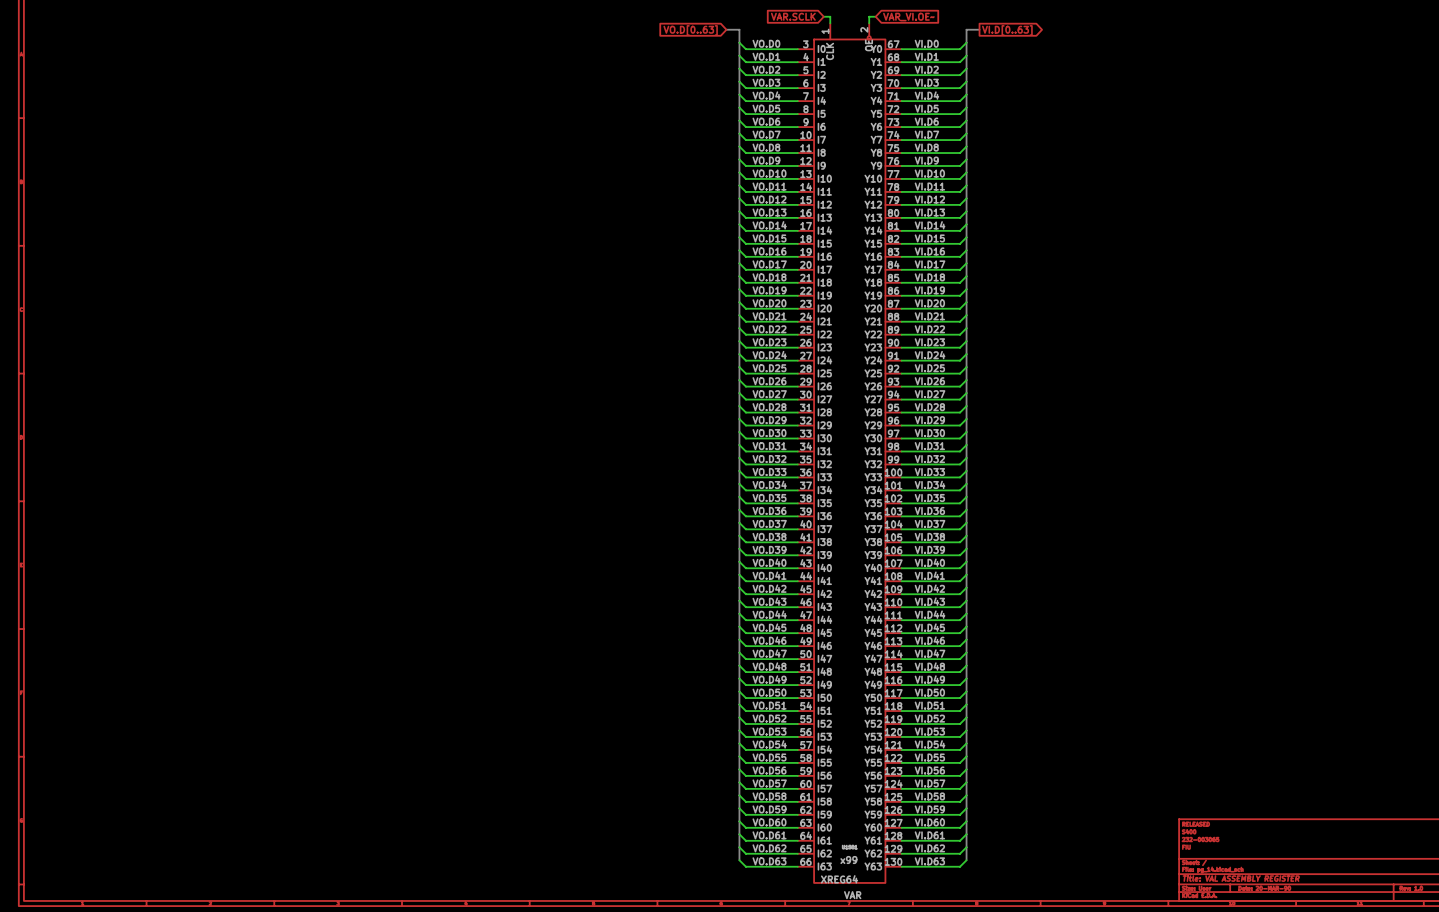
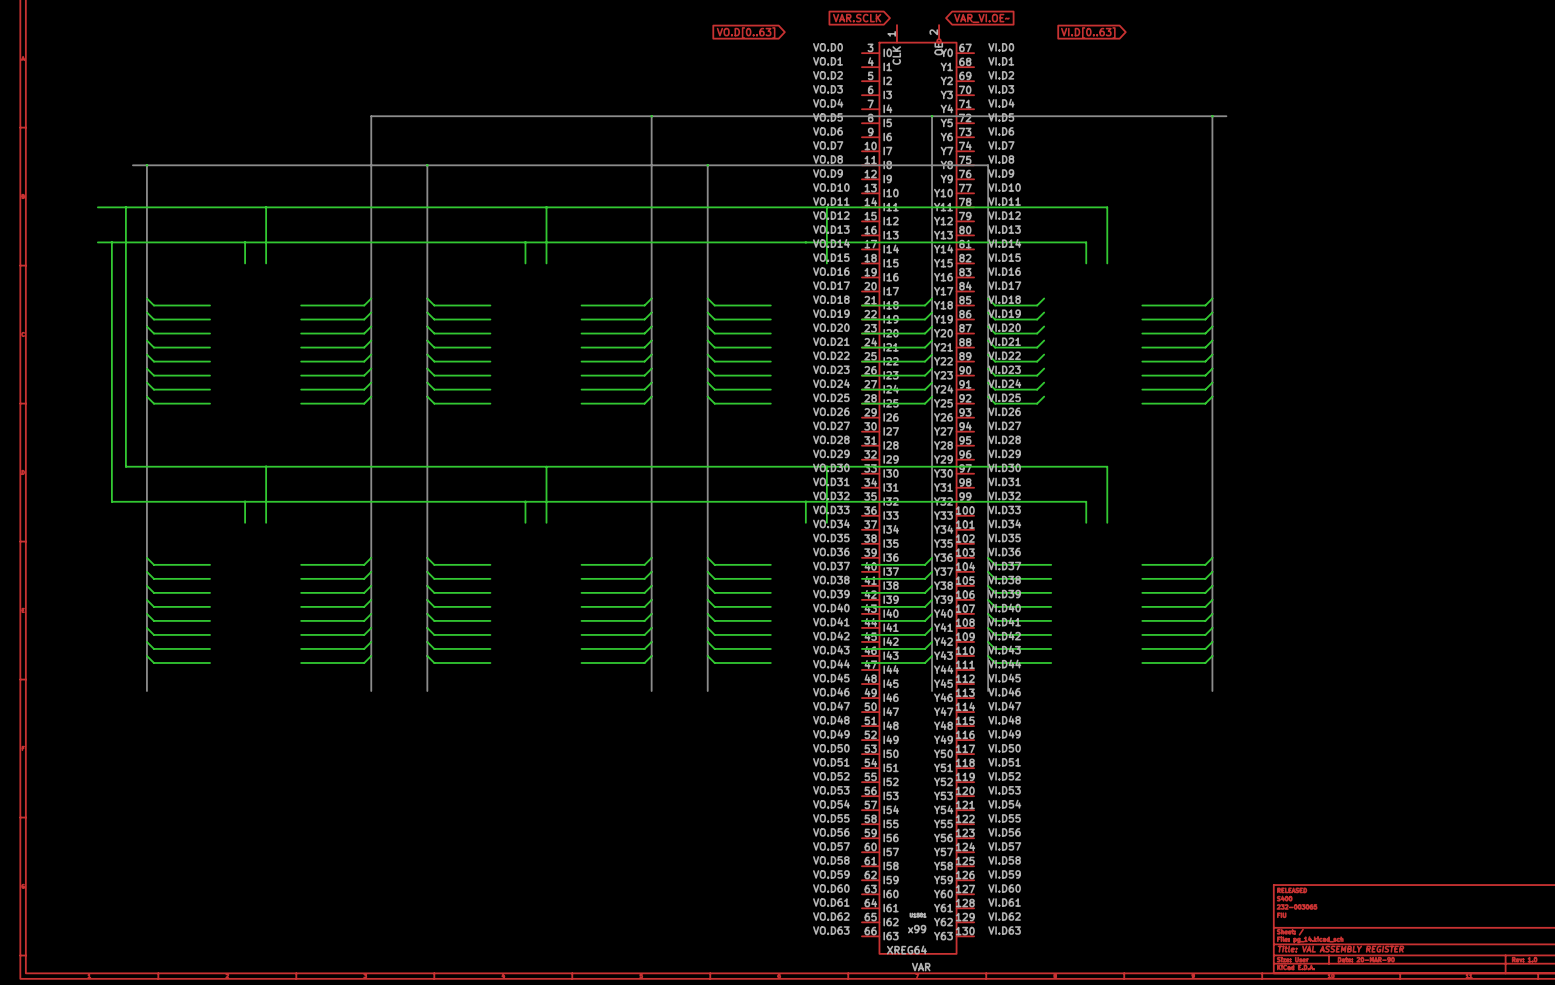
wire: (823, 16) (830, 16) (830, 23) -> none
wire: (875, 16) (869, 16) (869, 23) -> none
bus: (726, 29) (739, 29) (739, 860) -> none
bus: (979, 29) (966, 29) (966, 860) -> none
wire: (739, 42) (745, 49) (797, 49) -> none
wire: (966, 42) (960, 49) (901, 49) -> none
wire: (739, 55) (745, 62) (797, 62) -> none
wire: (966, 55) (960, 62) (901, 62) -> none
wire: (739, 68) (745, 75) (797, 75) -> none
wire: (966, 68) (960, 75) (901, 75) -> none
wire: (739, 81) (745, 88) (797, 88) -> none
wire: (966, 81) (960, 88) (901, 88) -> none
wire: (739, 94) (745, 101) (797, 101) -> none
wire: (966, 94) (960, 101) (901, 101) -> none
bus: none -> (651, 116) (651, 691)
junction: none -> (651, 116)
wire: (739, 107) (745, 114) (797, 114) -> none
bus: none -> (932, 116) (932, 691)
junction: none -> (932, 116)
wire: (966, 107) (960, 114) (901, 114) -> none
bus: none -> (1212, 116) (1212, 691)
junction: none -> (1212, 116)
bus: none -> (1226, 116) (371, 116) (371, 691)
wire: (739, 120) (745, 127) (797, 127) -> none
wire: (966, 120) (960, 127) (901, 127) -> none
wire: (739, 133) (745, 140) (797, 140) -> none
wire: (966, 133) (960, 140) (901, 140) -> none
wire: (966, 146) (960, 153) (901, 153) -> none
bus: none -> (132, 165) (988, 165) (988, 691)
bus: none -> (146, 165) (146, 691)
junction: none -> (146, 165)
bus: none -> (427, 165) (427, 691)
junction: none -> (427, 165)
bus: none -> (707, 165) (707, 691)
junction: none -> (707, 165)
wire: (739, 159) (745, 165) (797, 165) -> none
wire: (966, 159) (960, 165) (901, 165) -> none
wire: (739, 172) (745, 178) (797, 178) -> none
wire: (966, 172) (960, 178) (901, 178) -> none
wire: (739, 185) (745, 191) -> (97, 207) (805, 207)
wire: (966, 185) (960, 191) -> (1107, 263) (1107, 207) (1037, 207)
wire: none -> (125, 207) (125, 466) (1107, 466) (1107, 522)
wire: none -> (266, 207) (266, 263)
wire: none -> (546, 207) (546, 263)
wire: none -> (826, 207) (826, 263)
wire: none -> (861, 207) (974, 207)
wire: (739, 198) (745, 204) (797, 204) -> none
wire: (966, 198) (960, 204) (901, 204) -> none
wire: (739, 211) (745, 217) (797, 217) -> none
wire: (966, 211) (960, 217) (901, 217) -> none
wire: none -> (97, 242) (1086, 242) (1086, 263)
wire: none -> (111, 242) (111, 501) (805, 501) (805, 522)
wire: none -> (245, 242) (245, 263)
wire: none -> (525, 242) (525, 263)
wire: (739, 224) (745, 230) (797, 230) -> none
junction: none -> (805, 242)
wire: (966, 224) (960, 230) (901, 230) -> none
wire: (739, 237) (745, 243) (797, 243) -> none
wire: (966, 237) (960, 243) (901, 243) -> none
wire: (739, 250) (745, 256) (797, 256) -> none
wire: (966, 250) (960, 256) (901, 256) -> none
wire: (739, 263) (745, 269) (797, 269) -> none
wire: (966, 263) (960, 269) (901, 269) -> none
wire: none -> (146, 298) (153, 305) (210, 305)
wire: none -> (371, 298) (364, 305) (301, 305)
wire: none -> (427, 298) (434, 305) (490, 305)
wire: none -> (651, 298) (644, 305) (581, 305)
wire: none -> (707, 298) (714, 305) (770, 305)
wire: (739, 276) (745, 282) (797, 282) -> (932, 298) (925, 305) (861, 305)
wire: none -> (1212, 298) (1205, 305) (1142, 305)
wire: (901, 282) (921, 282) -> (988, 298) (995, 305)
wire: none -> (146, 312) (153, 319) (210, 319)
wire: none -> (371, 312) (364, 319) (301, 319)
wire: none -> (427, 312) (434, 319) (490, 319)
wire: none -> (651, 312) (644, 319) (581, 319)
wire: none -> (707, 312) (714, 319) (770, 319)
wire: (739, 289) (745, 295) (797, 295) -> (932, 312) (925, 319) (861, 319)
wire: none -> (1212, 312) (1205, 319) (1142, 319)
wire: (901, 295) (921, 295) -> (988, 312) (995, 319)
wire: none -> (146, 326) (153, 333) (210, 333)
wire: none -> (371, 326) (364, 333) (301, 333)
wire: none -> (427, 326) (434, 333) (490, 333)
wire: none -> (651, 326) (644, 333) (581, 333)
wire: none -> (707, 326) (714, 333) (770, 333)
wire: (739, 302) (745, 308) (797, 308) -> (932, 326) (925, 333) (861, 333)
wire: none -> (1212, 326) (1205, 333) (1142, 333)
wire: (901, 308) (921, 308) -> (988, 326) (995, 333)
wire: none -> (146, 340) (153, 347) (210, 347)
wire: none -> (371, 340) (364, 347) (301, 347)
wire: none -> (427, 340) (434, 347) (490, 347)
wire: none -> (651, 340) (644, 347) (581, 347)
wire: none -> (707, 340) (714, 347) (770, 347)
wire: (739, 315) (745, 321) (797, 321) -> (932, 340) (925, 347) (861, 347)
wire: none -> (1212, 340) (1205, 347) (1142, 347)
wire: (901, 321) (921, 321) -> (988, 340) (995, 347)
wire: none -> (146, 354) (153, 361) (210, 361)
wire: none -> (371, 354) (364, 361) (301, 361)
wire: none -> (427, 354) (434, 361) (490, 361)
wire: none -> (651, 354) (644, 361) (581, 361)
wire: none -> (707, 354) (714, 361) (770, 361)
wire: (739, 328) (745, 334) (797, 334) -> (932, 354) (925, 361) (861, 361)
wire: none -> (1212, 354) (1205, 361) (1142, 361)
wire: (901, 334) (921, 334) -> (988, 354) (995, 361)
wire: none -> (146, 368) (153, 375) (210, 375)
wire: none -> (371, 368) (364, 375) (301, 375)
wire: none -> (427, 368) (434, 375) (490, 375)
wire: none -> (651, 368) (644, 375) (581, 375)
wire: none -> (707, 368) (714, 375) (770, 375)
wire: (739, 341) (745, 347) (797, 347) -> (932, 368) (925, 375) (861, 375)
wire: none -> (1212, 368) (1205, 375) (1142, 375)
wire: (901, 347) (921, 347) -> (988, 368) (995, 375)
wire: none -> (146, 382) (153, 389) (210, 389)
wire: none -> (371, 382) (364, 389) (301, 389)
wire: none -> (427, 382) (434, 389) (490, 389)
wire: none -> (651, 382) (644, 389) (581, 389)
wire: none -> (707, 382) (714, 389) (770, 389)
wire: (739, 354) (745, 360) (797, 360) -> (932, 382) (925, 389) (861, 389)
wire: none -> (1212, 382) (1205, 389) (1142, 389)
wire: (901, 360) (921, 360) -> (988, 382) (995, 389)
wire: none -> (146, 396) (153, 403) (210, 403)
wire: none -> (371, 396) (364, 403) (301, 403)
wire: none -> (427, 396) (434, 403) (490, 403)
wire: none -> (651, 396) (644, 403) (581, 403)
wire: none -> (707, 396) (714, 403) (770, 403)
wire: (739, 367) (745, 373) (797, 373) -> (932, 396) (925, 403) (861, 403)
wire: none -> (1212, 396) (1205, 403) (1142, 403)
wire: (901, 373) (921, 373) -> (988, 396) (995, 403)
wire: (739, 380) (745, 386) (797, 386) -> none
wire: (966, 380) (960, 386) (901, 386) -> none
wire: (739, 393) (745, 399) (797, 399) -> none
wire: (966, 393) (960, 399) (901, 399) -> none
wire: (739, 406) (745, 412) (797, 412) -> none
wire: (966, 406) (960, 412) (901, 412) -> none
wire: (739, 419) (745, 425) (797, 425) -> none
wire: (966, 419) (960, 425) (901, 425) -> none
wire: none -> (266, 466) (266, 522)
wire: none -> (546, 466) (546, 522)
wire: (739, 432) (745, 438) (797, 438) -> none
wire: none -> (826, 466) (826, 522)
wire: (966, 432) (960, 438) (901, 438) -> none
wire: (739, 444) (745, 451) (797, 451) -> none
wire: (966, 444) (960, 451) (901, 451) -> none
wire: (739, 457) (745, 464) -> none
wire: (966, 457) (960, 464) -> (1086, 522) (1086, 501) (1037, 501)
wire: none -> (245, 501) (245, 522)
wire: none -> (525, 501) (525, 522)
wire: none -> (861, 501) (974, 501)
wire: (739, 470) (745, 477) (797, 477) -> none
wire: (966, 470) (960, 477) (901, 477) -> none
wire: (739, 483) (745, 490) (797, 490) -> none
wire: (966, 483) (960, 490) (901, 490) -> none
wire: (739, 496) (745, 503) (797, 503) -> none
wire: (966, 496) (960, 503) (901, 503) -> none
wire: (739, 509) (745, 516) (797, 516) -> none
wire: (966, 509) (960, 516) (901, 516) -> none
wire: none -> (146, 557) (153, 564) (210, 564)
wire: none -> (371, 557) (364, 564) (301, 564)
wire: none -> (427, 557) (434, 564) (490, 564)
wire: none -> (651, 557) (644, 564) (581, 564)
wire: none -> (707, 557) (714, 564) (770, 564)
wire: none -> (932, 557) (925, 564) (861, 564)
wire: none -> (988, 557) (995, 564) (1051, 564)
wire: none -> (1212, 557) (1205, 564) (1142, 564)
wire: (739, 522) (745, 529) (797, 529) -> none
wire: (966, 522) (960, 529) (901, 529) -> none
wire: none -> (146, 571) (153, 578) (210, 578)
wire: none -> (371, 571) (364, 578) (301, 578)
wire: none -> (427, 571) (434, 578) (490, 578)
wire: none -> (651, 571) (644, 578) (581, 578)
wire: none -> (707, 571) (714, 578) (770, 578)
wire: none -> (932, 571) (925, 578) (861, 578)
wire: none -> (988, 571) (995, 578) (1051, 578)
wire: none -> (1212, 571) (1205, 578) (1142, 578)
wire: (739, 535) (745, 542) (797, 542) -> none
wire: (966, 535) (960, 542) (901, 542) -> none
wire: none -> (146, 585) (153, 592) (210, 592)
wire: none -> (371, 585) (364, 592) (301, 592)
wire: none -> (427, 585) (434, 592) (490, 592)
wire: none -> (651, 585) (644, 592) (581, 592)
wire: none -> (707, 585) (714, 592) (770, 592)
wire: none -> (932, 585) (925, 592) (861, 592)
wire: none -> (988, 585) (995, 592) (1051, 592)
wire: none -> (1212, 585) (1205, 592) (1142, 592)
wire: (739, 548) (745, 555) (797, 555) -> none
wire: (966, 548) (960, 555) (901, 555) -> none
wire: none -> (146, 599) (153, 606) (210, 606)
wire: none -> (371, 599) (364, 606) (301, 606)
wire: none -> (427, 599) (434, 606) (490, 606)
wire: none -> (651, 599) (644, 606) (581, 606)
wire: none -> (707, 599) (714, 606) (770, 606)
wire: none -> (932, 599) (925, 606) (861, 606)
wire: none -> (988, 599) (995, 606) (1051, 606)
wire: none -> (1212, 599) (1205, 606) (1142, 606)
wire: (739, 561) (745, 568) (797, 568) -> none
wire: (966, 561) (960, 568) (901, 568) -> none
wire: none -> (146, 613) (153, 620) (210, 620)
wire: none -> (371, 613) (364, 620) (301, 620)
wire: none -> (427, 613) (434, 620) (490, 620)
wire: none -> (651, 613) (644, 620) (581, 620)
wire: none -> (707, 613) (714, 620) (770, 620)
wire: none -> (932, 613) (925, 620) (861, 620)
wire: none -> (988, 613) (995, 620) (1051, 620)
wire: none -> (1212, 613) (1205, 620) (1142, 620)
wire: (739, 574) (745, 581) (797, 581) -> none
wire: (966, 574) (960, 581) (901, 581) -> none
wire: none -> (146, 627) (153, 634) (210, 634)
wire: none -> (371, 627) (364, 634) (301, 634)
wire: none -> (427, 627) (434, 634) (490, 634)
wire: none -> (651, 627) (644, 634) (581, 634)
wire: none -> (707, 627) (714, 634) (770, 634)
wire: none -> (932, 627) (925, 634) (861, 634)
wire: none -> (988, 627) (995, 634) (1051, 634)
wire: none -> (1212, 627) (1205, 634) (1142, 634)
wire: (739, 587) (745, 594) (797, 594) -> none
wire: (966, 587) (960, 594) (901, 594) -> none
wire: none -> (146, 641) (153, 648) (210, 648)
wire: none -> (371, 641) (364, 648) (301, 648)
wire: none -> (427, 641) (434, 648) (490, 648)
wire: none -> (651, 641) (644, 648) (581, 648)
wire: none -> (707, 641) (714, 648) (770, 648)
wire: none -> (932, 641) (925, 648) (861, 648)
wire: none -> (988, 641) (995, 648) (1051, 648)
wire: none -> (1212, 641) (1205, 648) (1142, 648)
wire: (739, 600) (745, 607) (797, 607) -> none
wire: (966, 600) (960, 607) (901, 607) -> none
wire: none -> (146, 655) (153, 662) (210, 662)
wire: none -> (371, 655) (364, 662) (301, 662)
wire: none -> (427, 655) (434, 662) (490, 662)
wire: none -> (651, 655) (644, 662) (581, 662)
wire: none -> (707, 655) (714, 662) (770, 662)
wire: none -> (932, 655) (925, 662) (861, 662)
wire: none -> (988, 655) (995, 662) (1051, 662)
wire: none -> (1212, 655) (1205, 662) (1142, 662)
wire: (739, 613) (745, 620) (797, 620) -> none
wire: (966, 613) (960, 620) (901, 620) -> none
wire: (739, 626) (745, 633) (797, 633) -> none
wire: (966, 626) (960, 633) (901, 633) -> none
wire: (739, 639) (745, 646) (797, 646) -> none
wire: (966, 639) (960, 646) (901, 646) -> none
wire: (739, 652) (745, 659) (797, 659) -> none
wire: (966, 652) (960, 659) (901, 659) -> none
wire: (739, 665) (745, 672) (797, 672) -> none
wire: (966, 665) (960, 672) (901, 672) -> none
wire: (739, 678) (745, 685) (797, 685) -> none
wire: (966, 678) (960, 685) (901, 685) -> none
wire: (739, 691) (745, 698) (797, 698) -> none
wire: (966, 691) (960, 698) (901, 698) -> none
wire: (739, 704) (745, 711) (797, 711) -> none
wire: (966, 704) (960, 711) (901, 711) -> none
wire: (739, 717) (745, 724) (797, 724) -> none
wire: (966, 717) (960, 724) (901, 724) -> none
wire: (739, 730) (745, 736) (797, 736) -> none
wire: (966, 730) (960, 736) (901, 736) -> none
wire: (739, 743) (745, 749) (797, 749) -> none
wire: (966, 743) (960, 749) (901, 749) -> none
wire: (739, 756) (745, 762) (797, 762) -> none
wire: (966, 756) (960, 762) (901, 762) -> none
wire: (739, 769) (745, 775) (797, 775) -> none
wire: (966, 769) (960, 775) (901, 775) -> none
wire: (739, 782) (745, 788) (797, 788) -> none
wire: (966, 782) (960, 788) (901, 788) -> none
wire: (739, 795) (745, 801) (797, 801) -> none
wire: (966, 795) (960, 801) (901, 801) -> none
wire: (739, 808) (745, 814) (797, 814) -> none
wire: (966, 808) (960, 814) (901, 814) -> none
wire: (739, 821) (745, 827) (797, 827) -> none
wire: (966, 821) (960, 827) (901, 827) -> none
wire: (739, 834) (745, 840) (797, 840) -> none
wire: (966, 834) (960, 840) (901, 840) -> none
wire: (739, 847) (745, 853) (797, 853) -> none
wire: (966, 847) (960, 853) (901, 853) -> none
wire: (739, 860) (745, 866) (797, 866) -> none
wire: (966, 860) (960, 866) (901, 866) -> none

